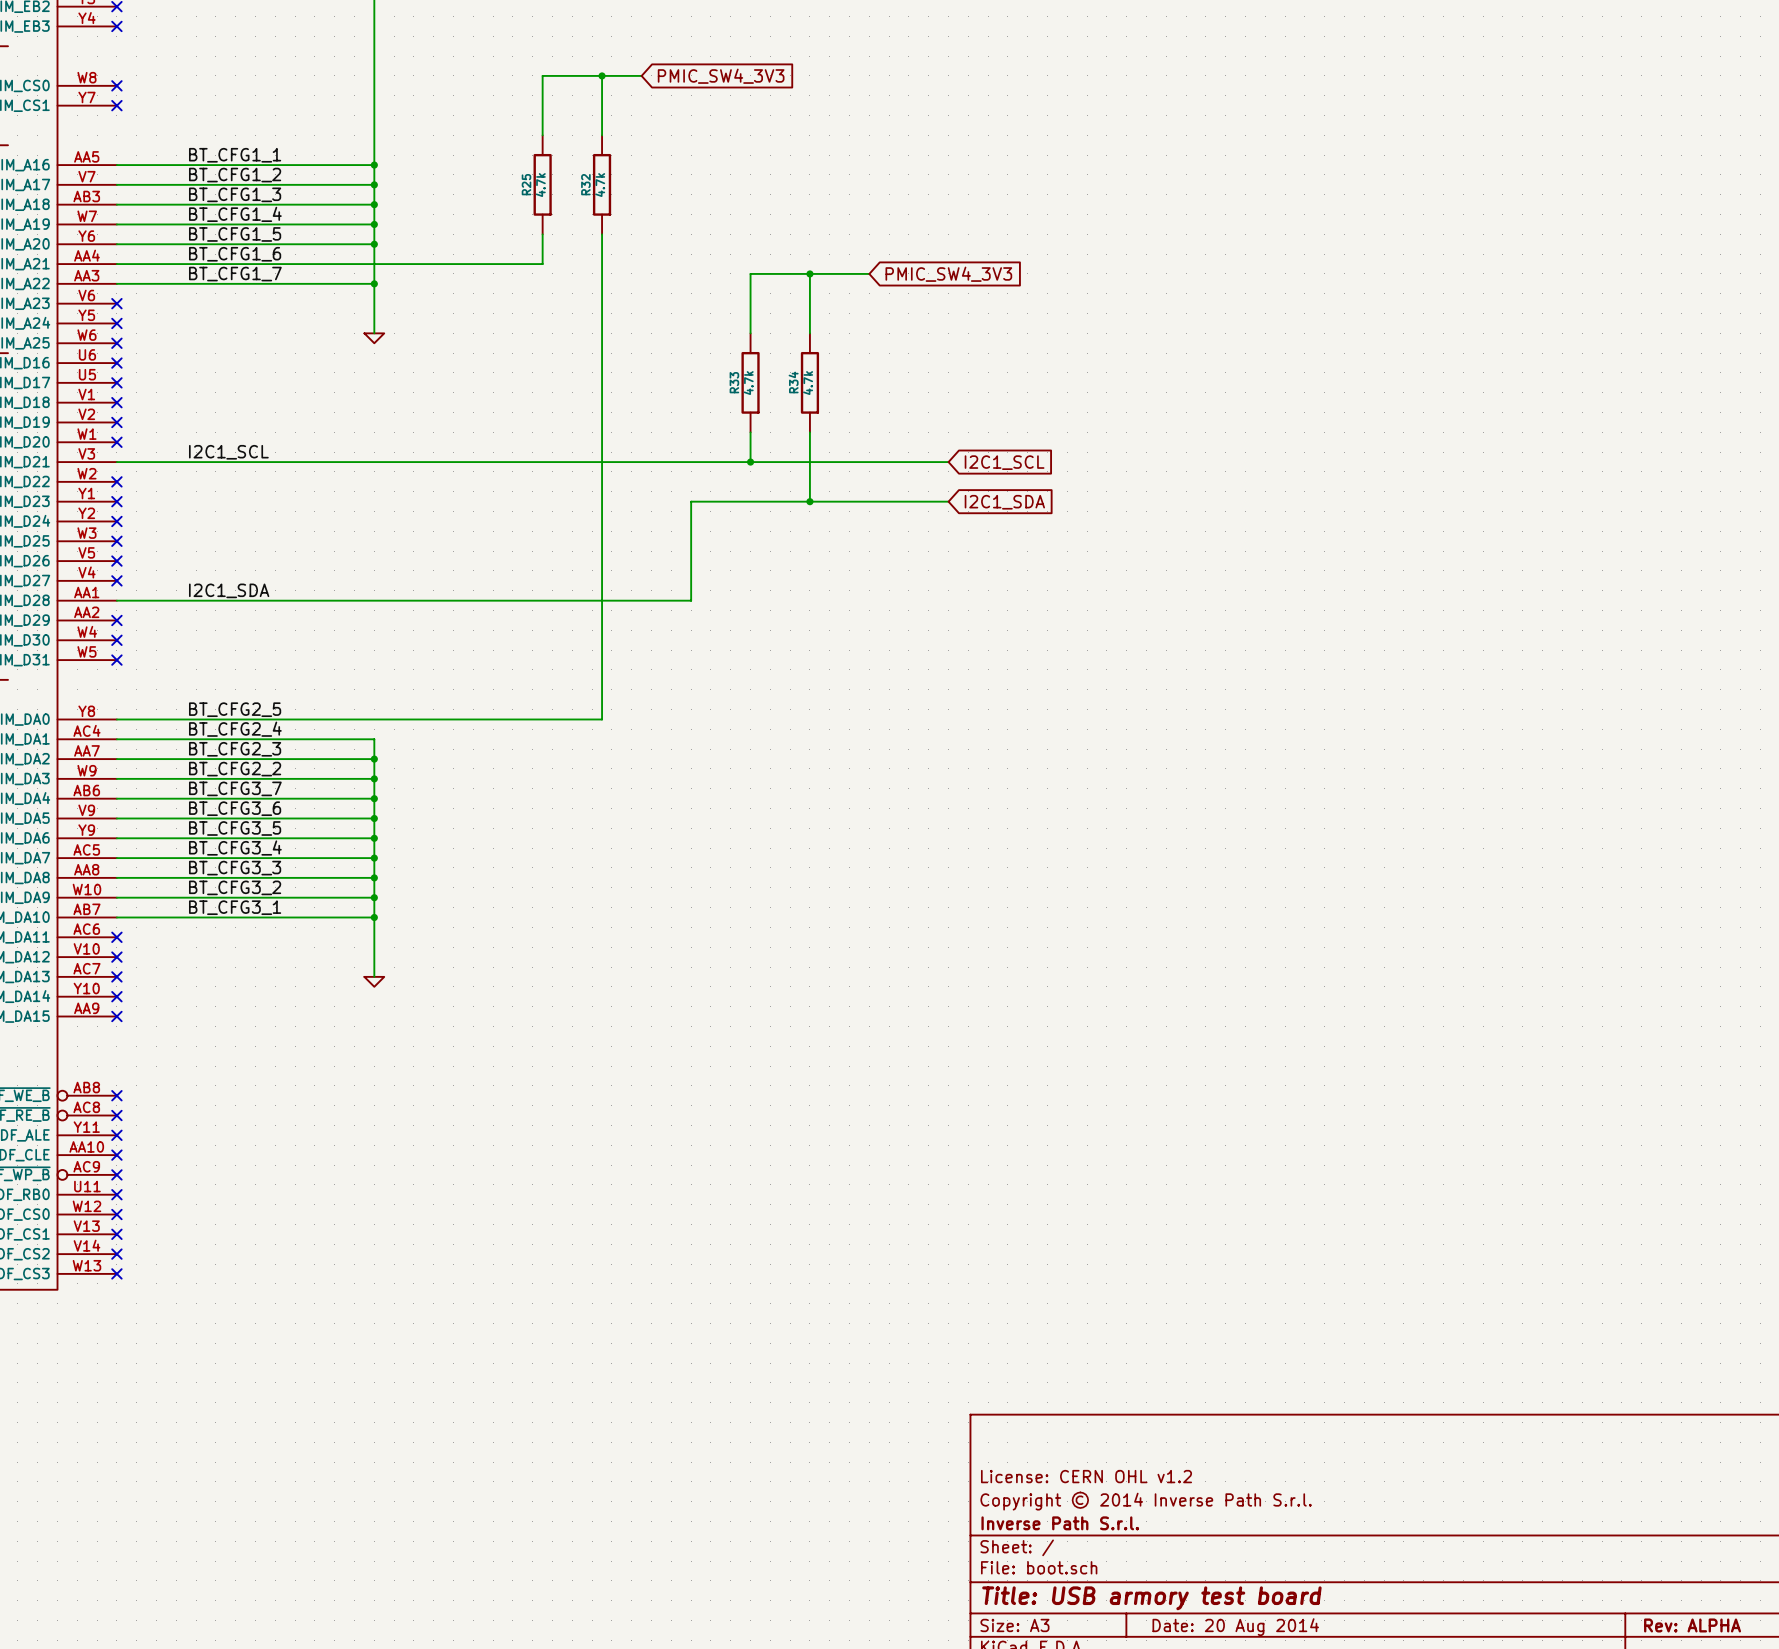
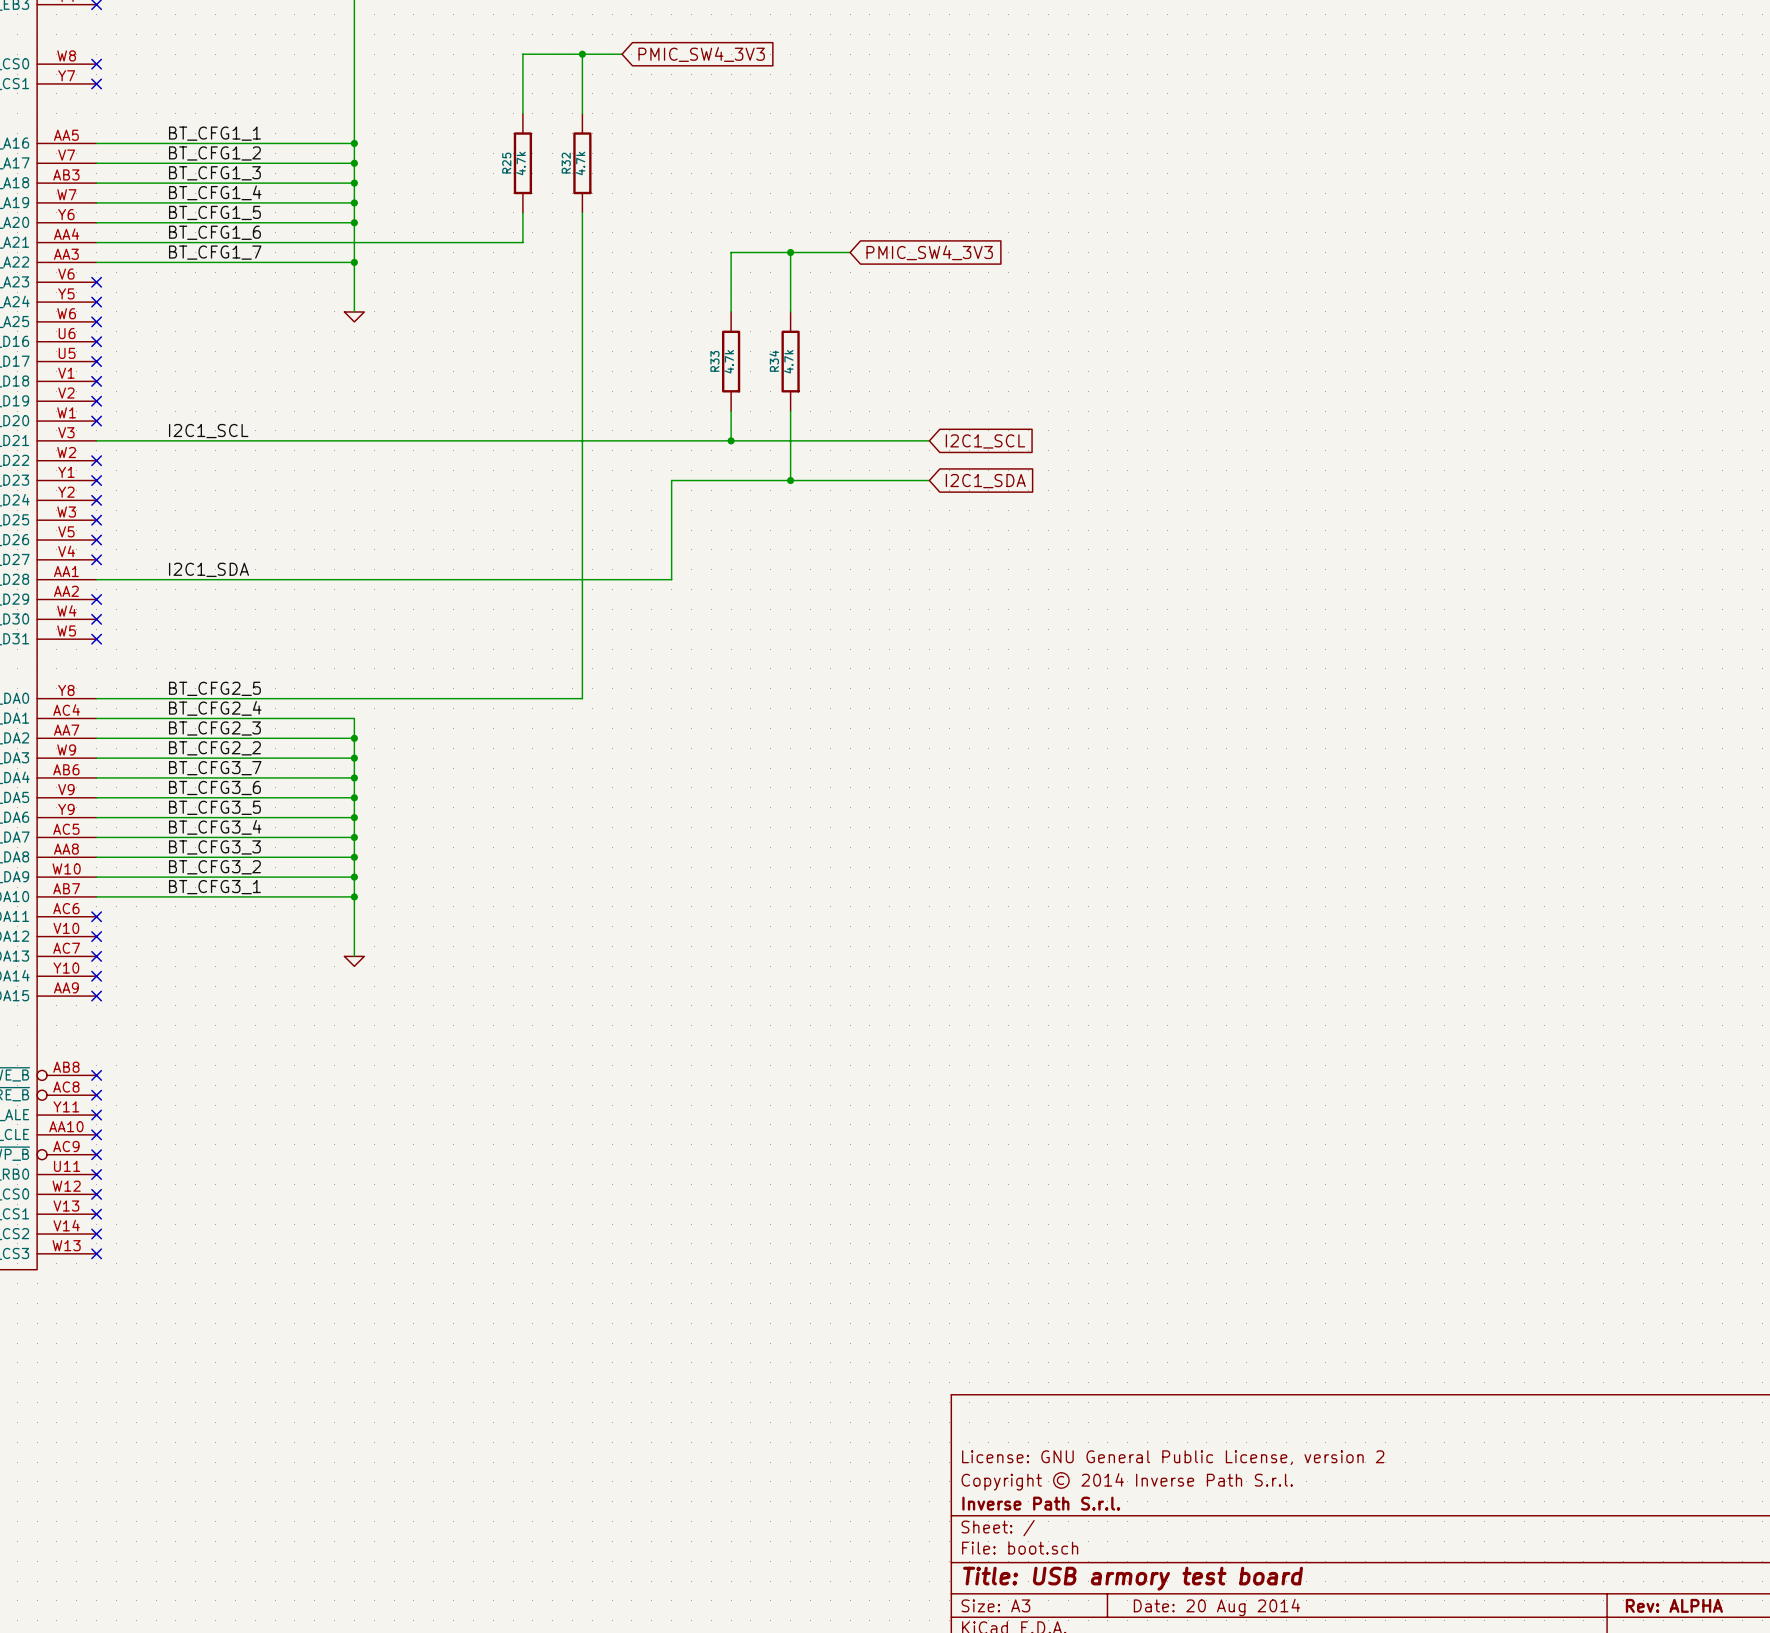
title block: License: CERN OHL v1.2 (1086, 1476) -> License: GNU General Public License, version 2 (1173, 1457)

